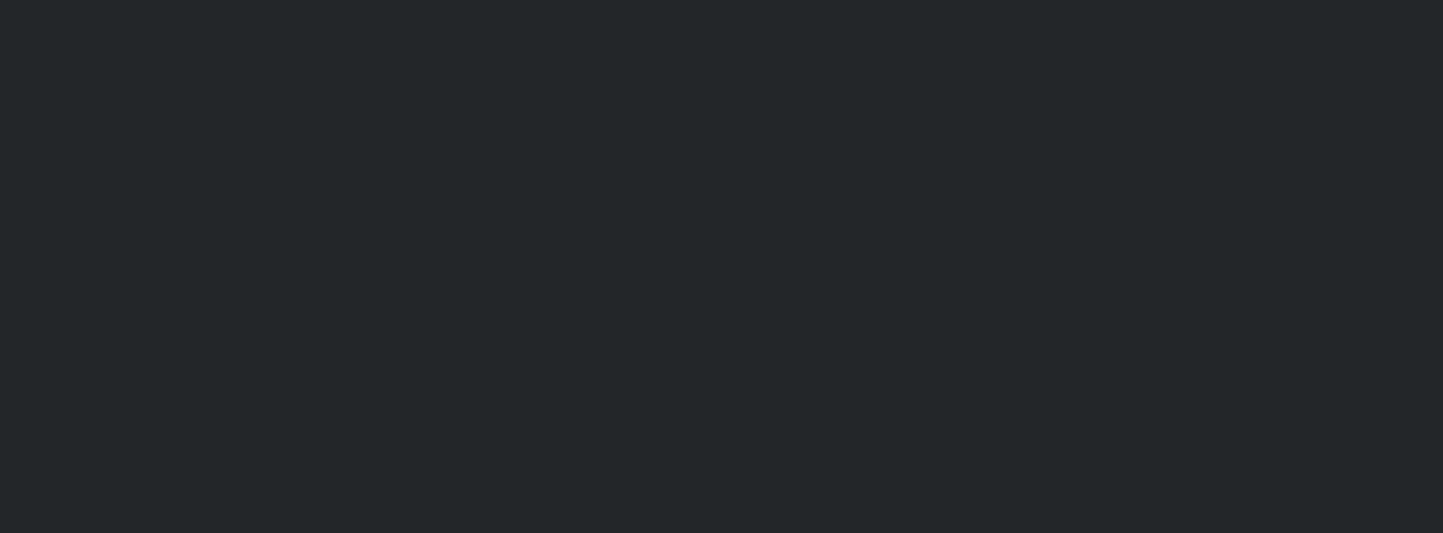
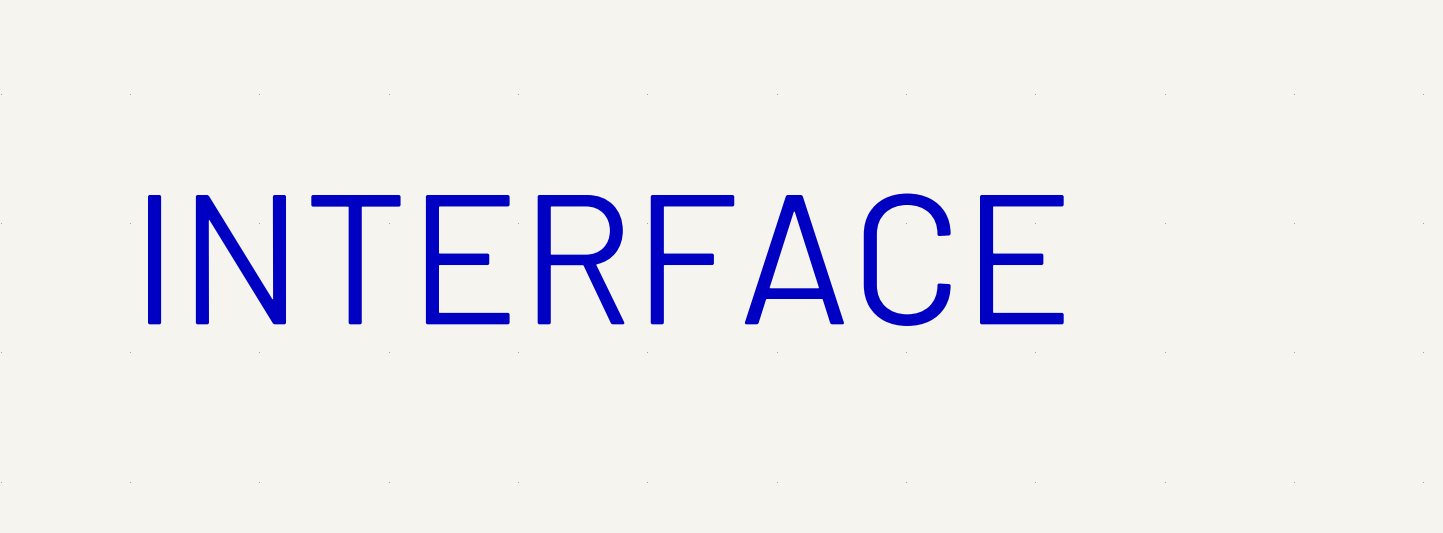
text: none -> INTERFACE (605, 259)

